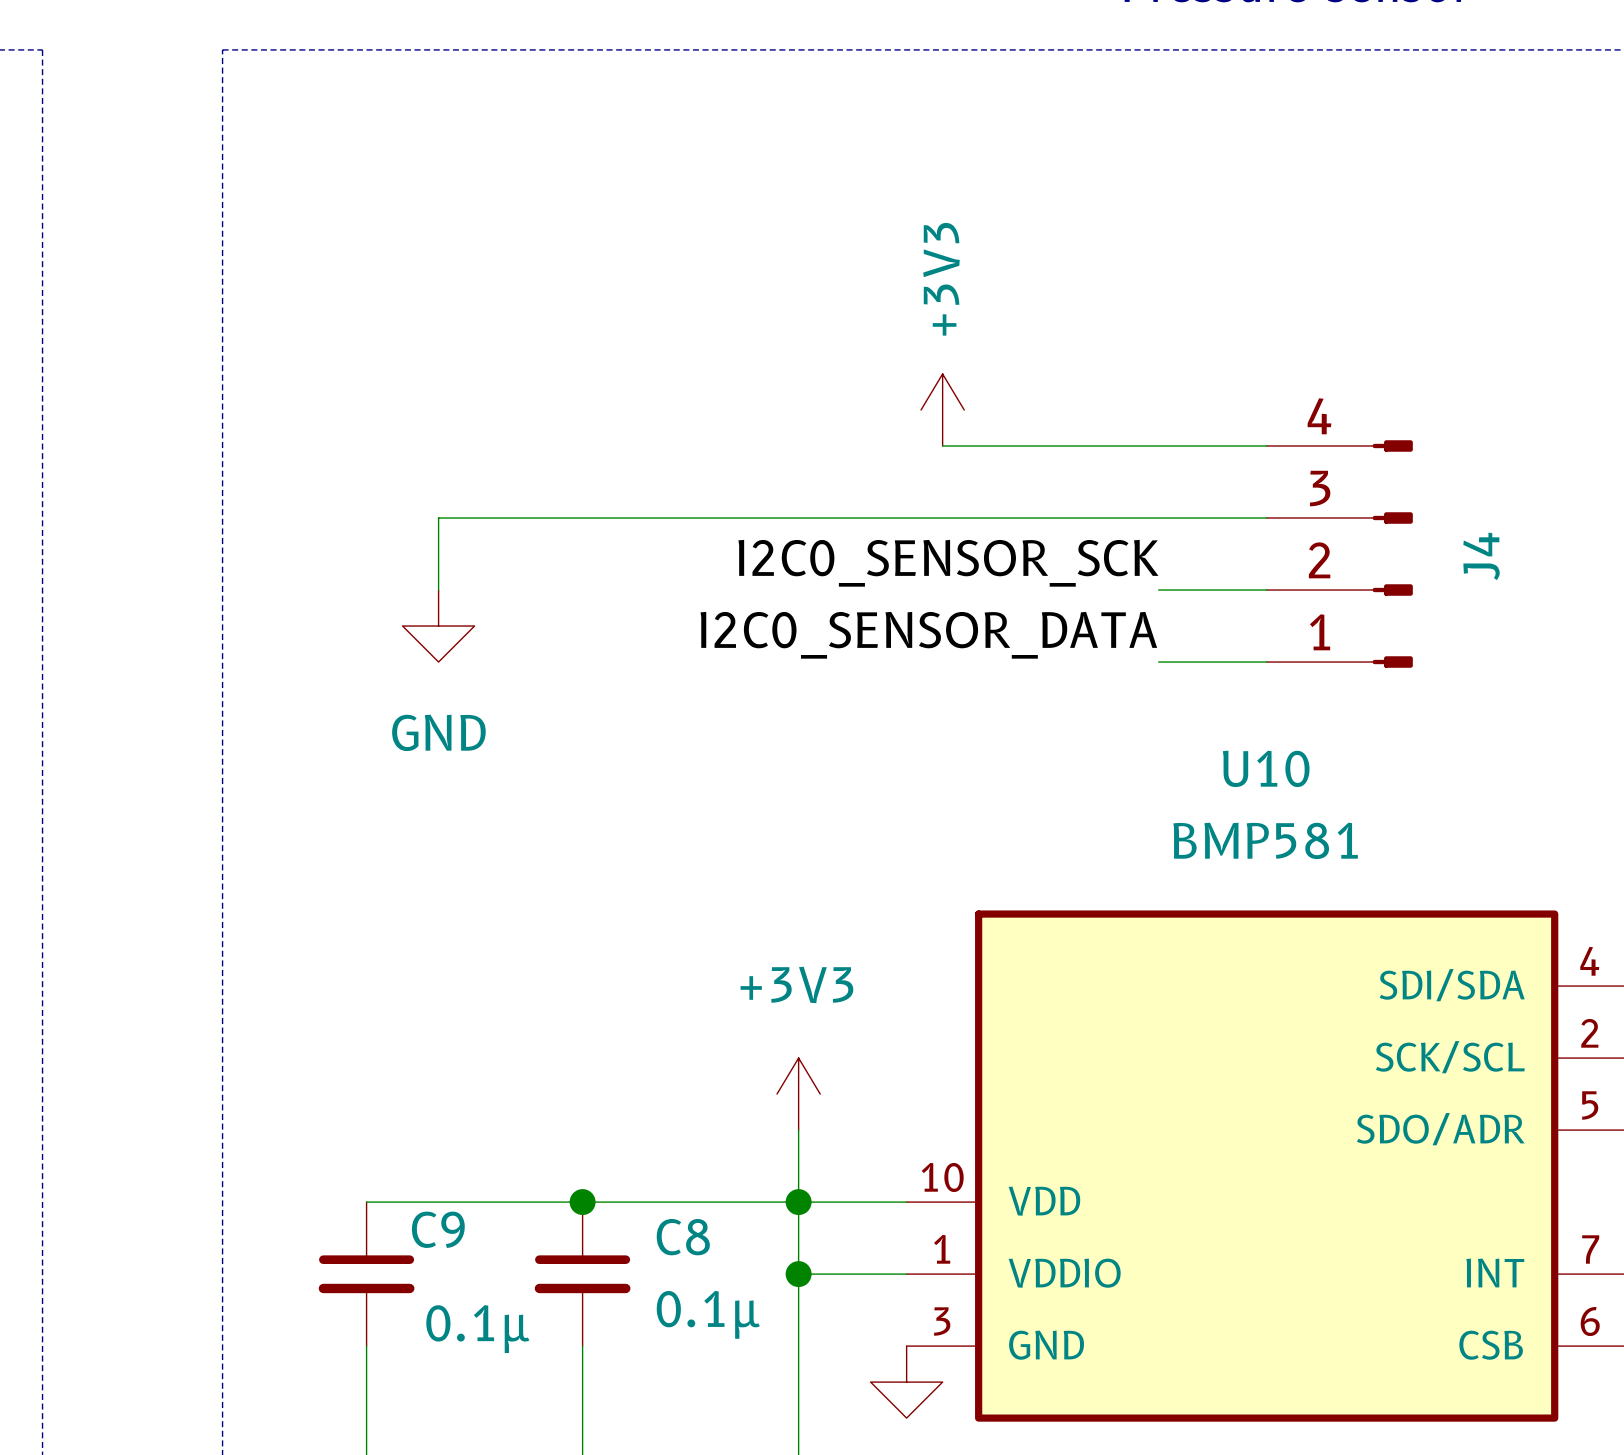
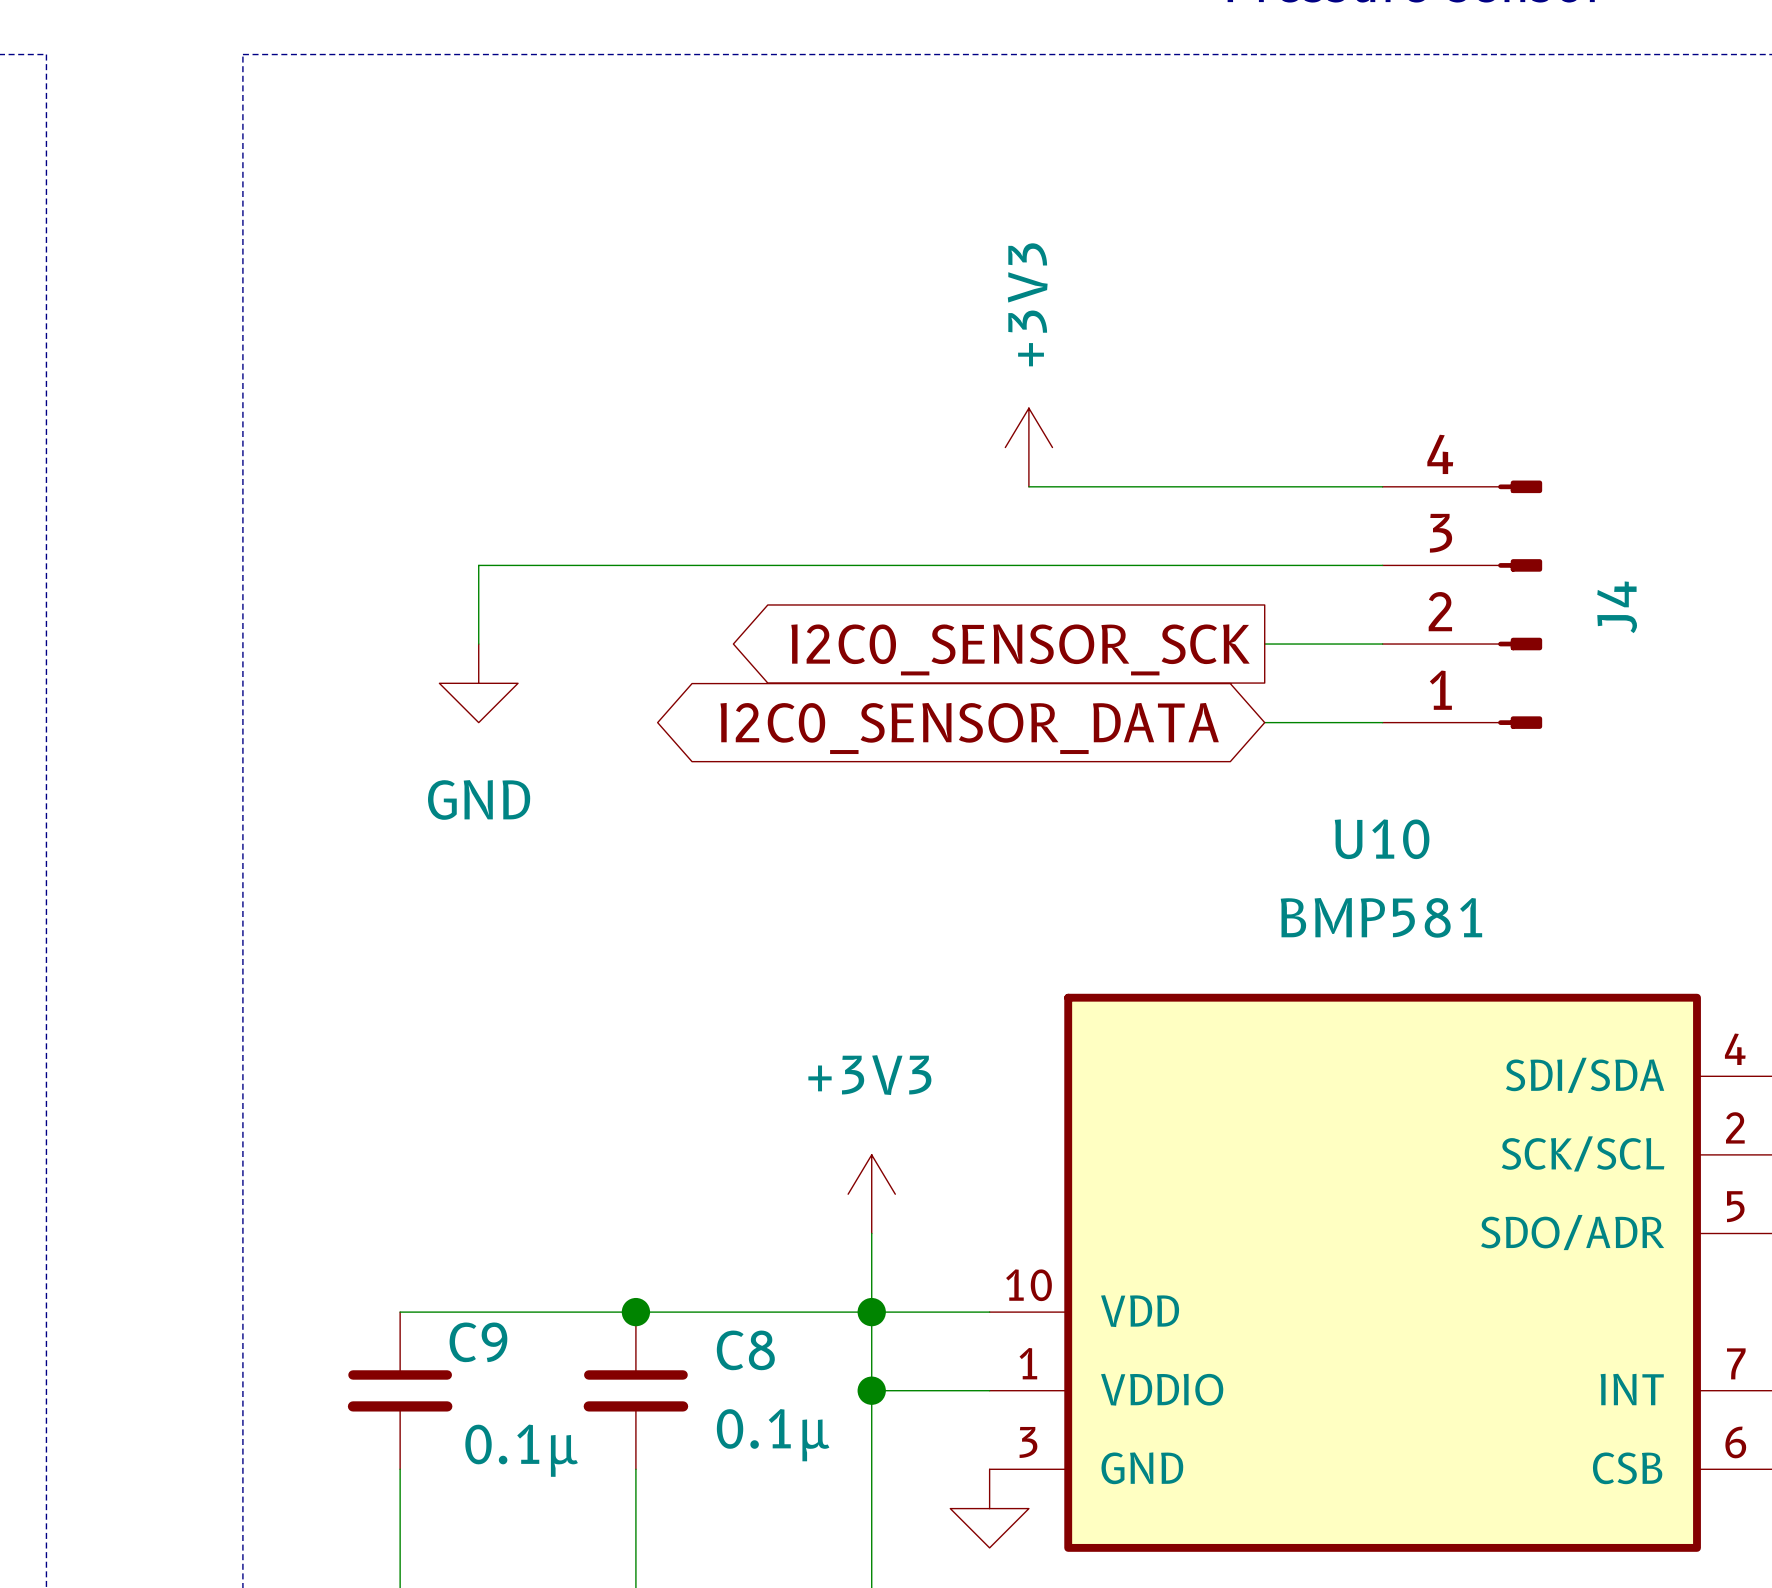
label: I2C0_SENSOR_SCK (948, 563) -> none
global label: none -> I2C0_SENSOR_SCK (1020, 649)
label: I2C0_SENSOR_DATA (928, 635) -> none
global label: none -> I2C0_SENSOR_DATA (969, 728)

